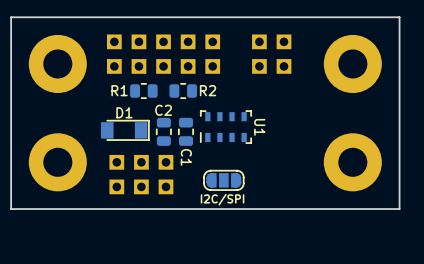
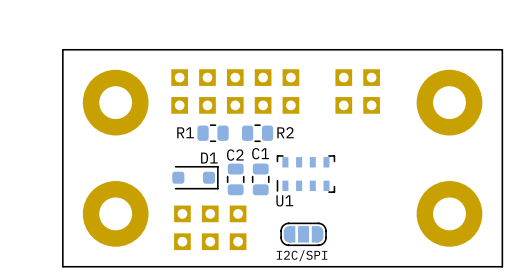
D1 footprint: [100, 120, 150, 141] -> [172, 166, 219, 190]
U1 name rotation: 0° (259, 127) -> 90° counterclockwise (284, 200)
U1 name position: U1 (259, 127) -> U1 (284, 200)
C1 name rotation: 0° (186, 157) -> 90° counterclockwise (260, 153)
C1 name position: C1 (186, 157) -> C1 (260, 153)

